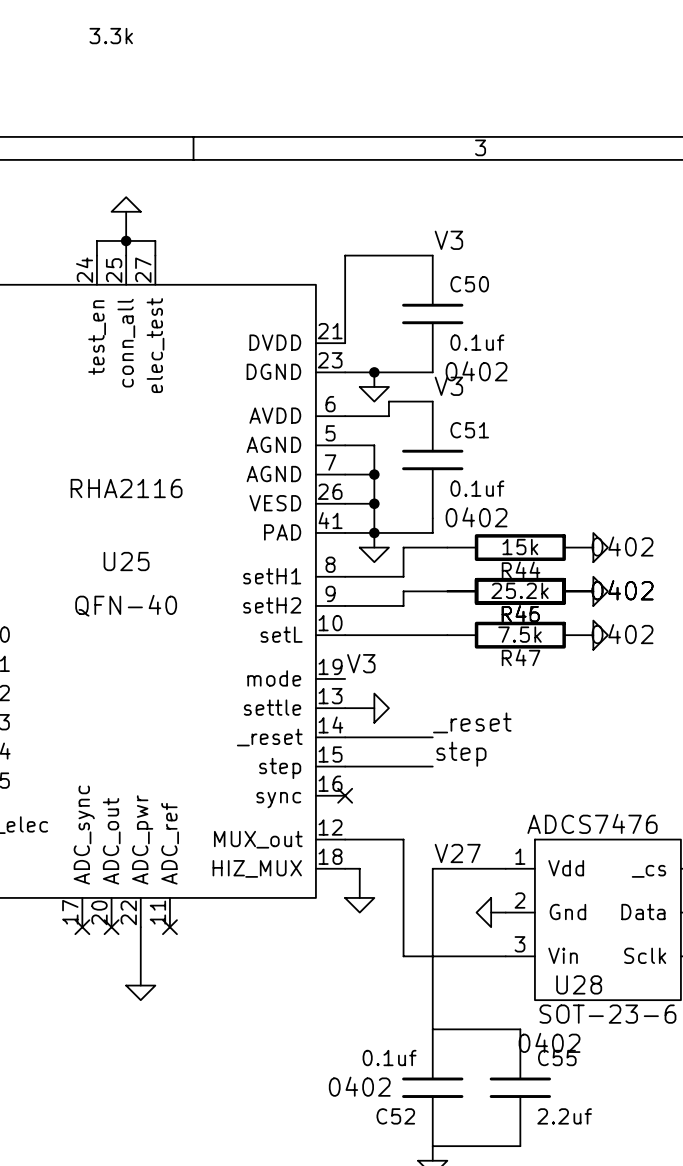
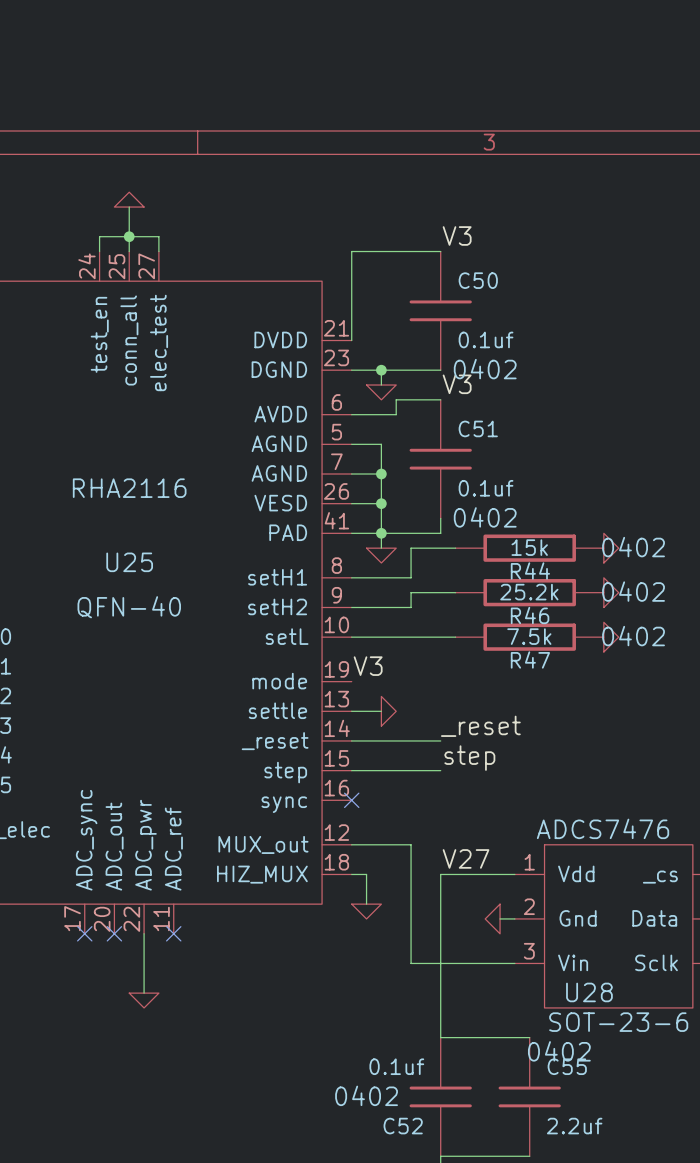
part: 3.3k (520, 591) -> none

